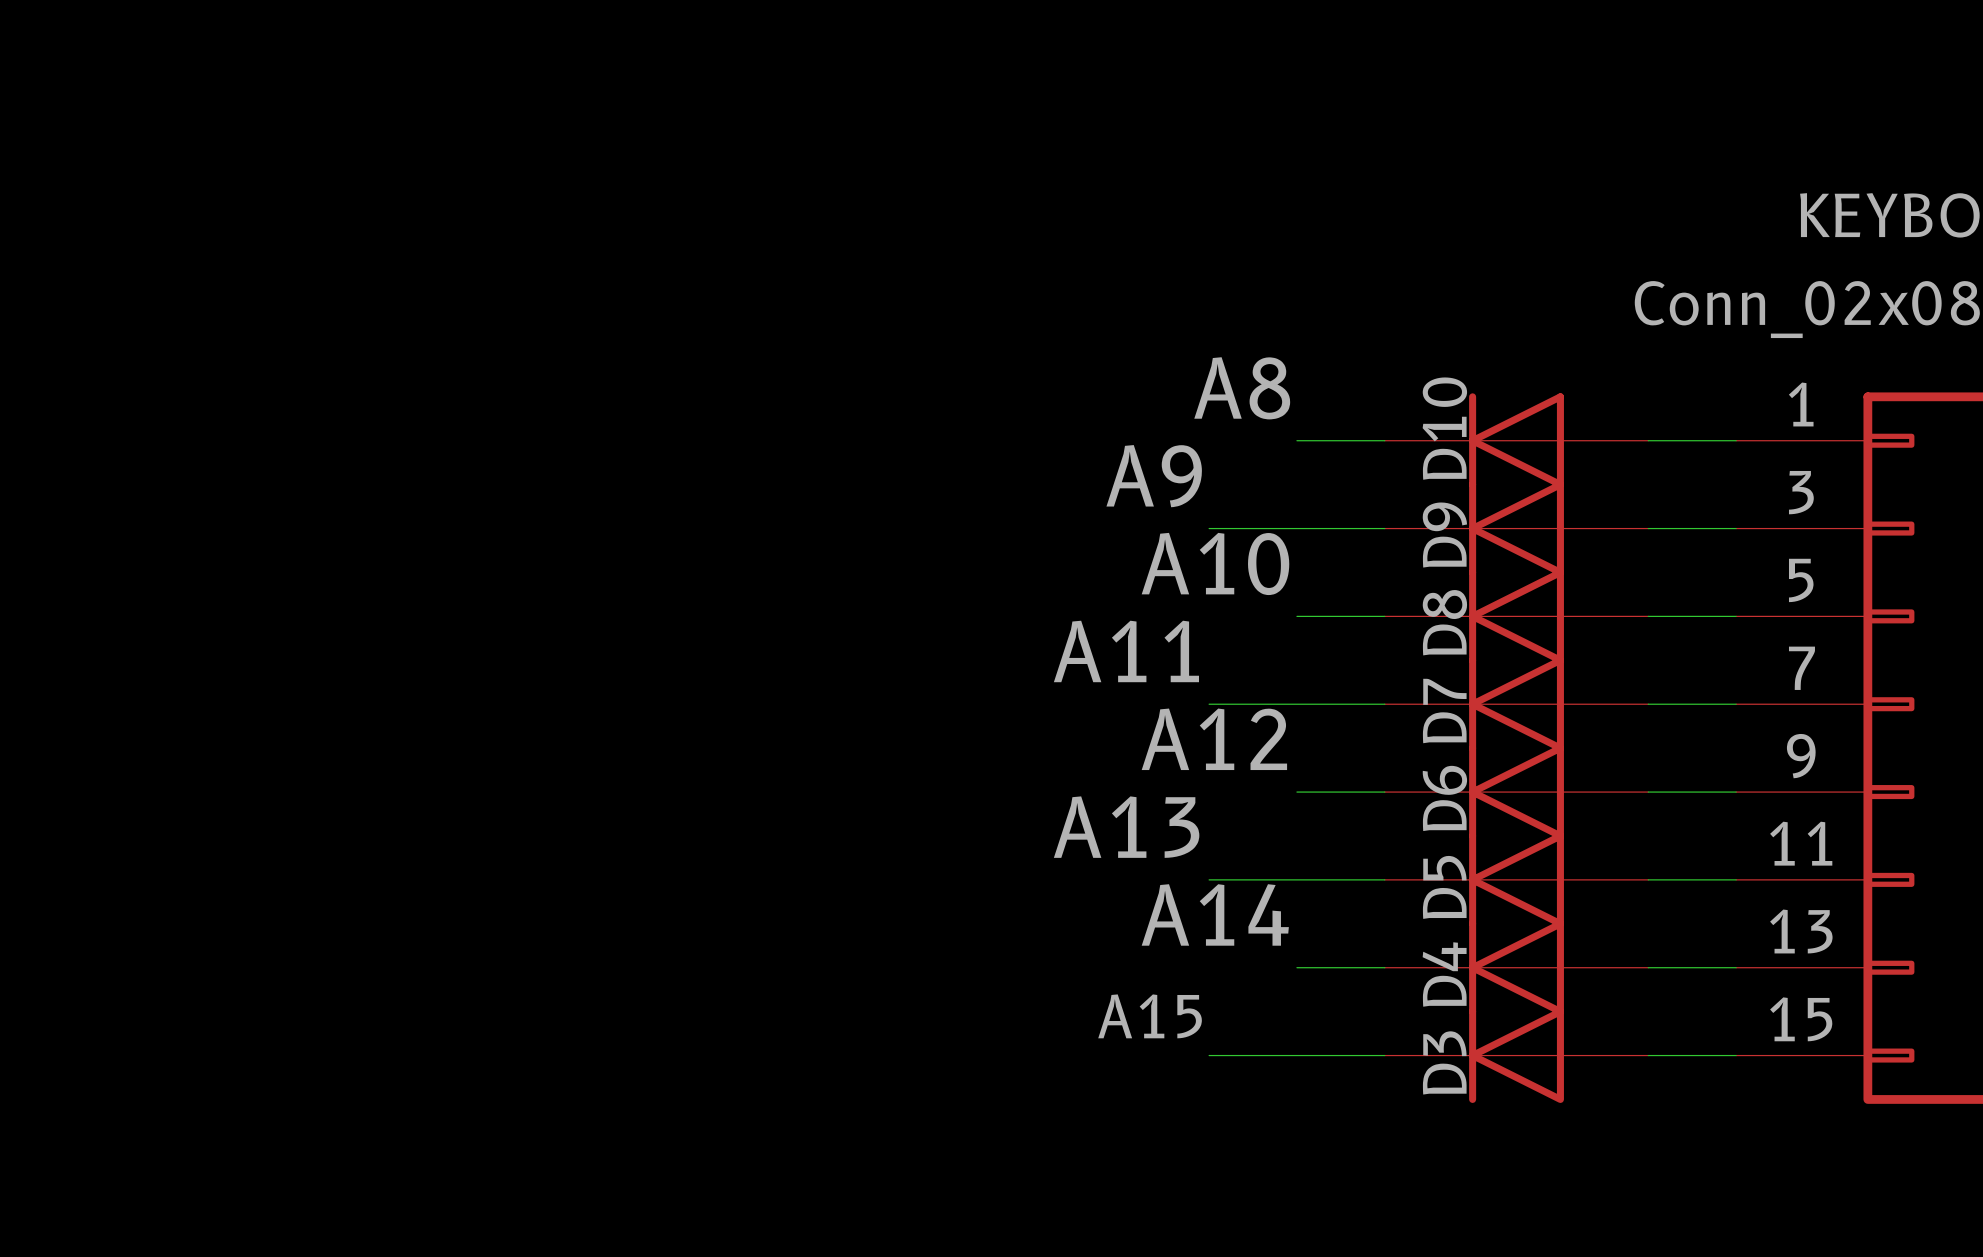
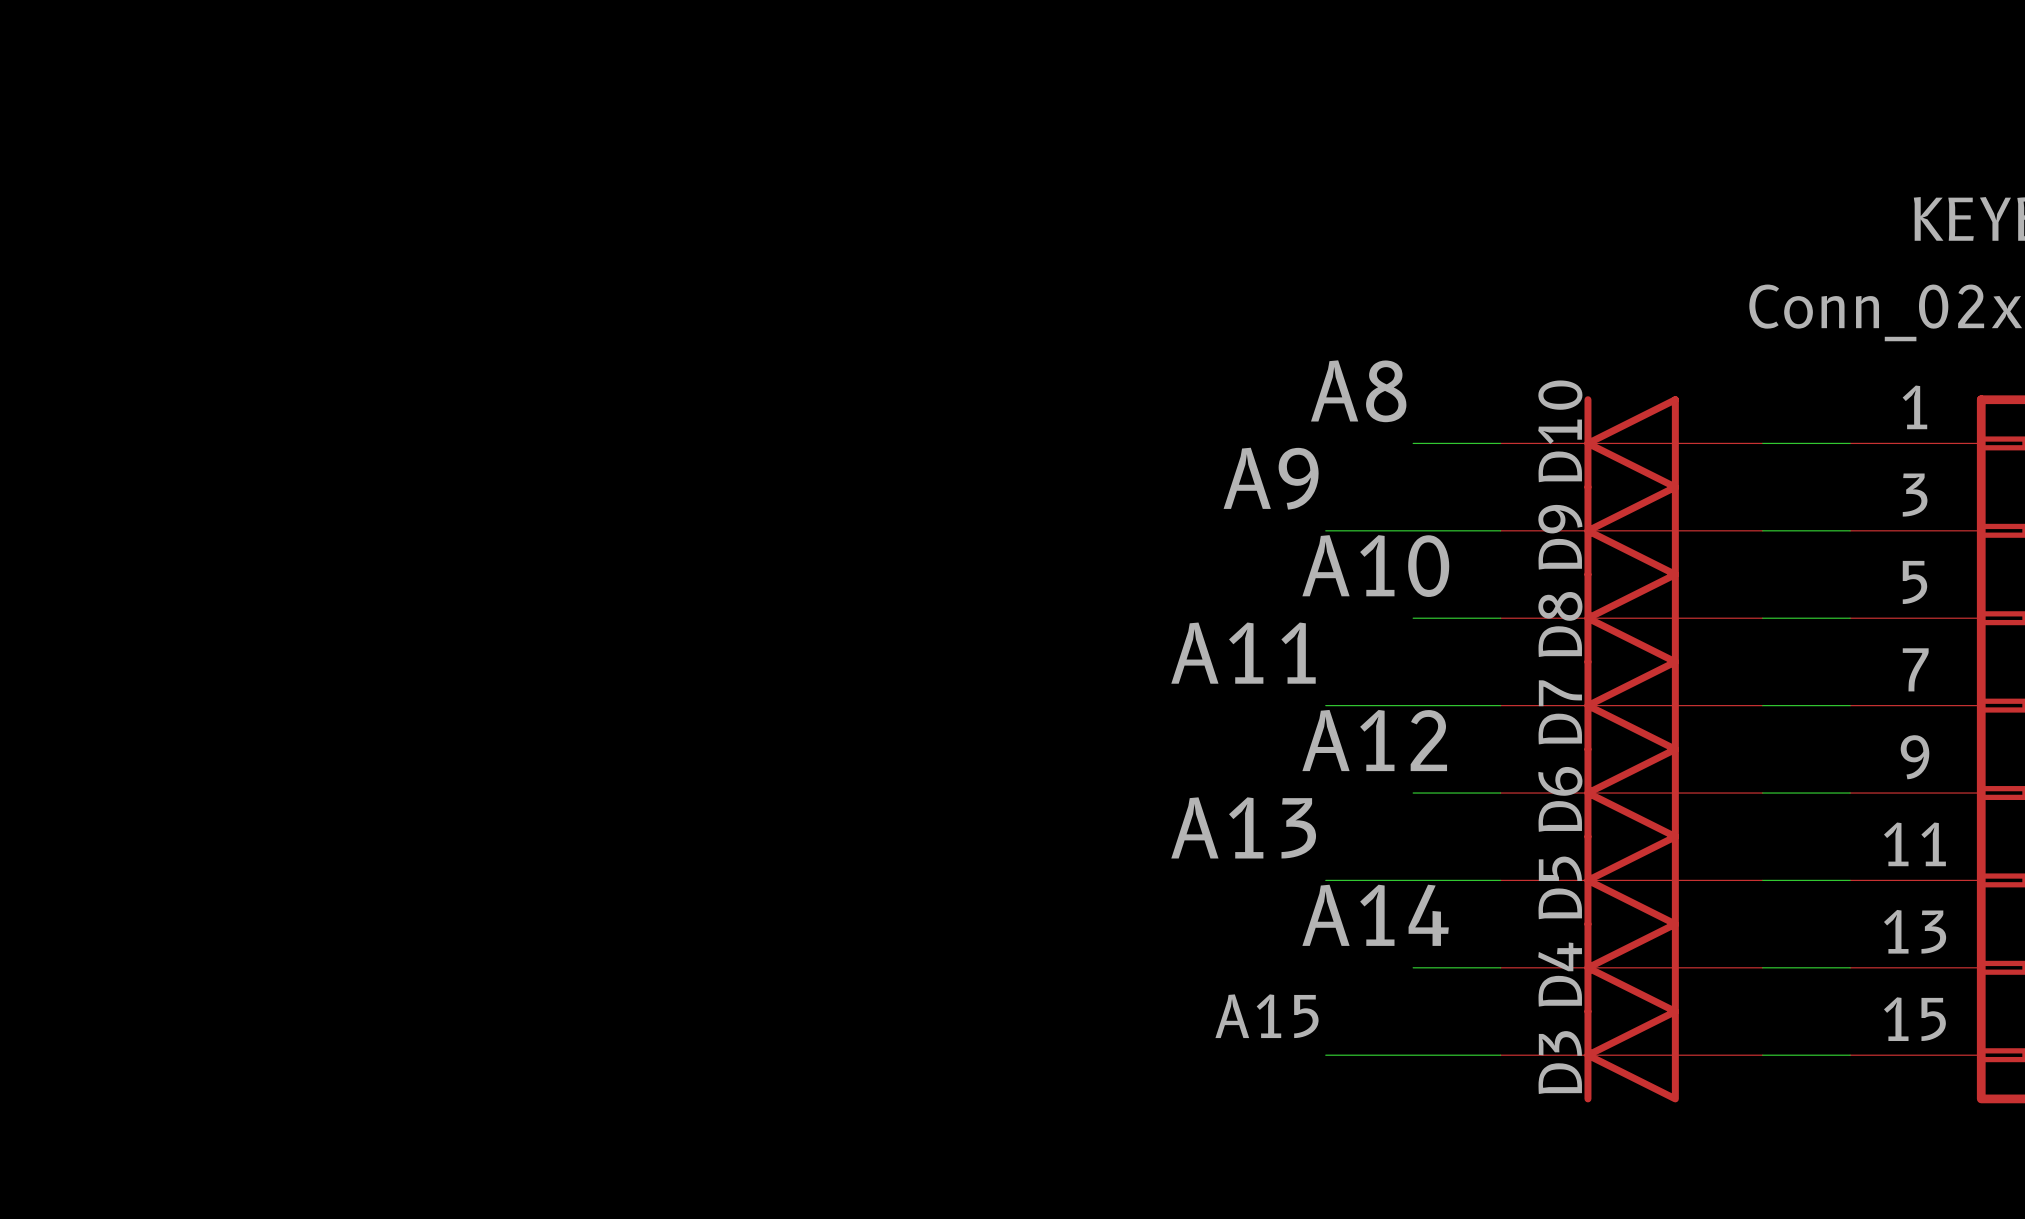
label position: A10 (1215, 563) -> A10 (1375, 566)
label position: A12 (1214, 739) -> A12 (1374, 740)
label position: A14 (1215, 914) -> A14 (1375, 915)

